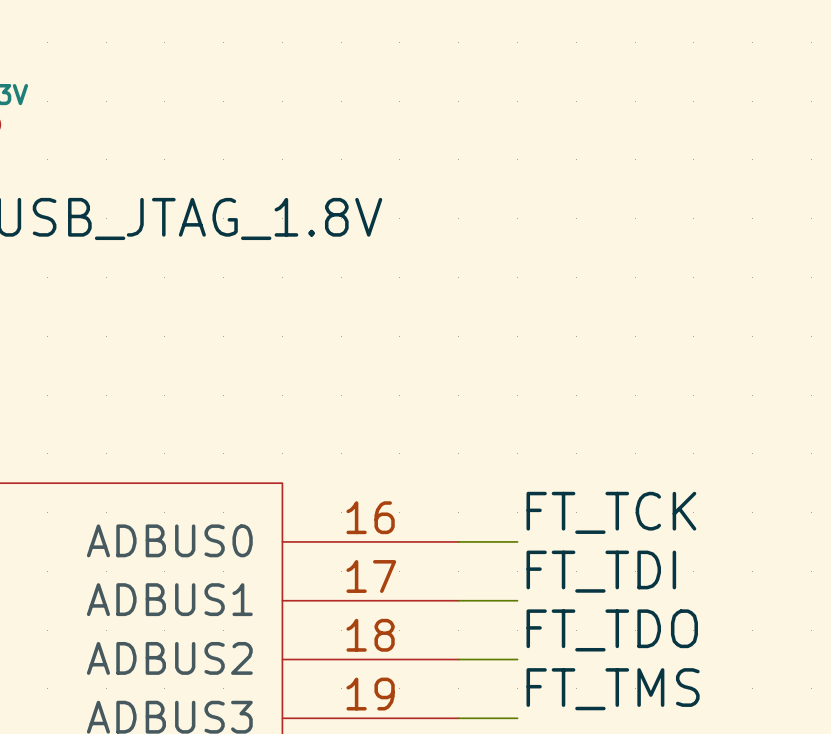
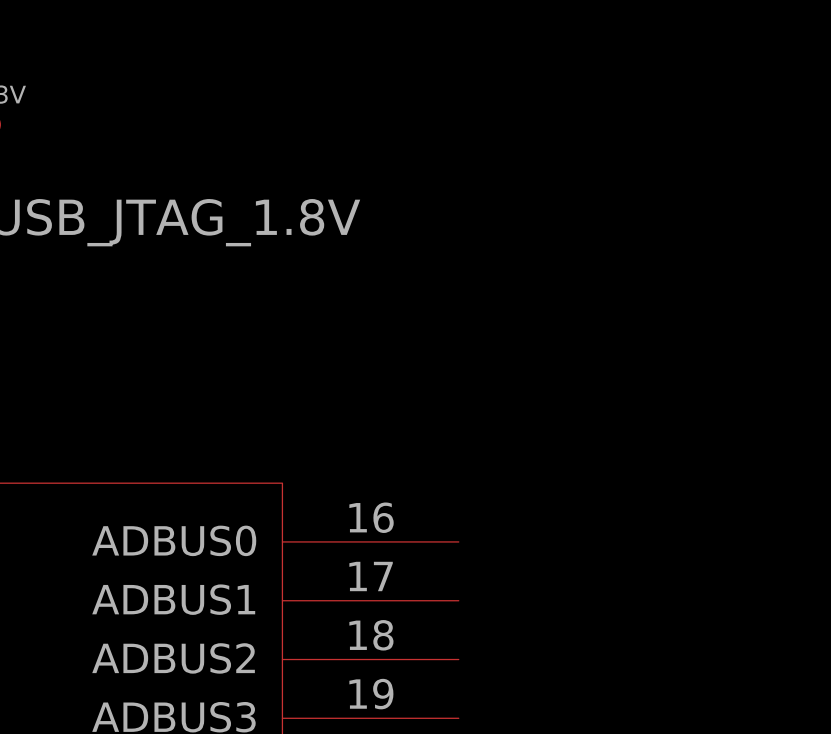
label: FT_TCK (611, 512) -> none
wire: (458, 541) (517, 541) -> none
label: FT_TDI (601, 571) -> none
wire: (458, 600) (517, 600) -> none
label: FT_TDO (612, 630) -> none
wire: (458, 659) (517, 659) -> none
label: FT_TMS (613, 689) -> none
wire: (458, 718) (517, 718) -> none

